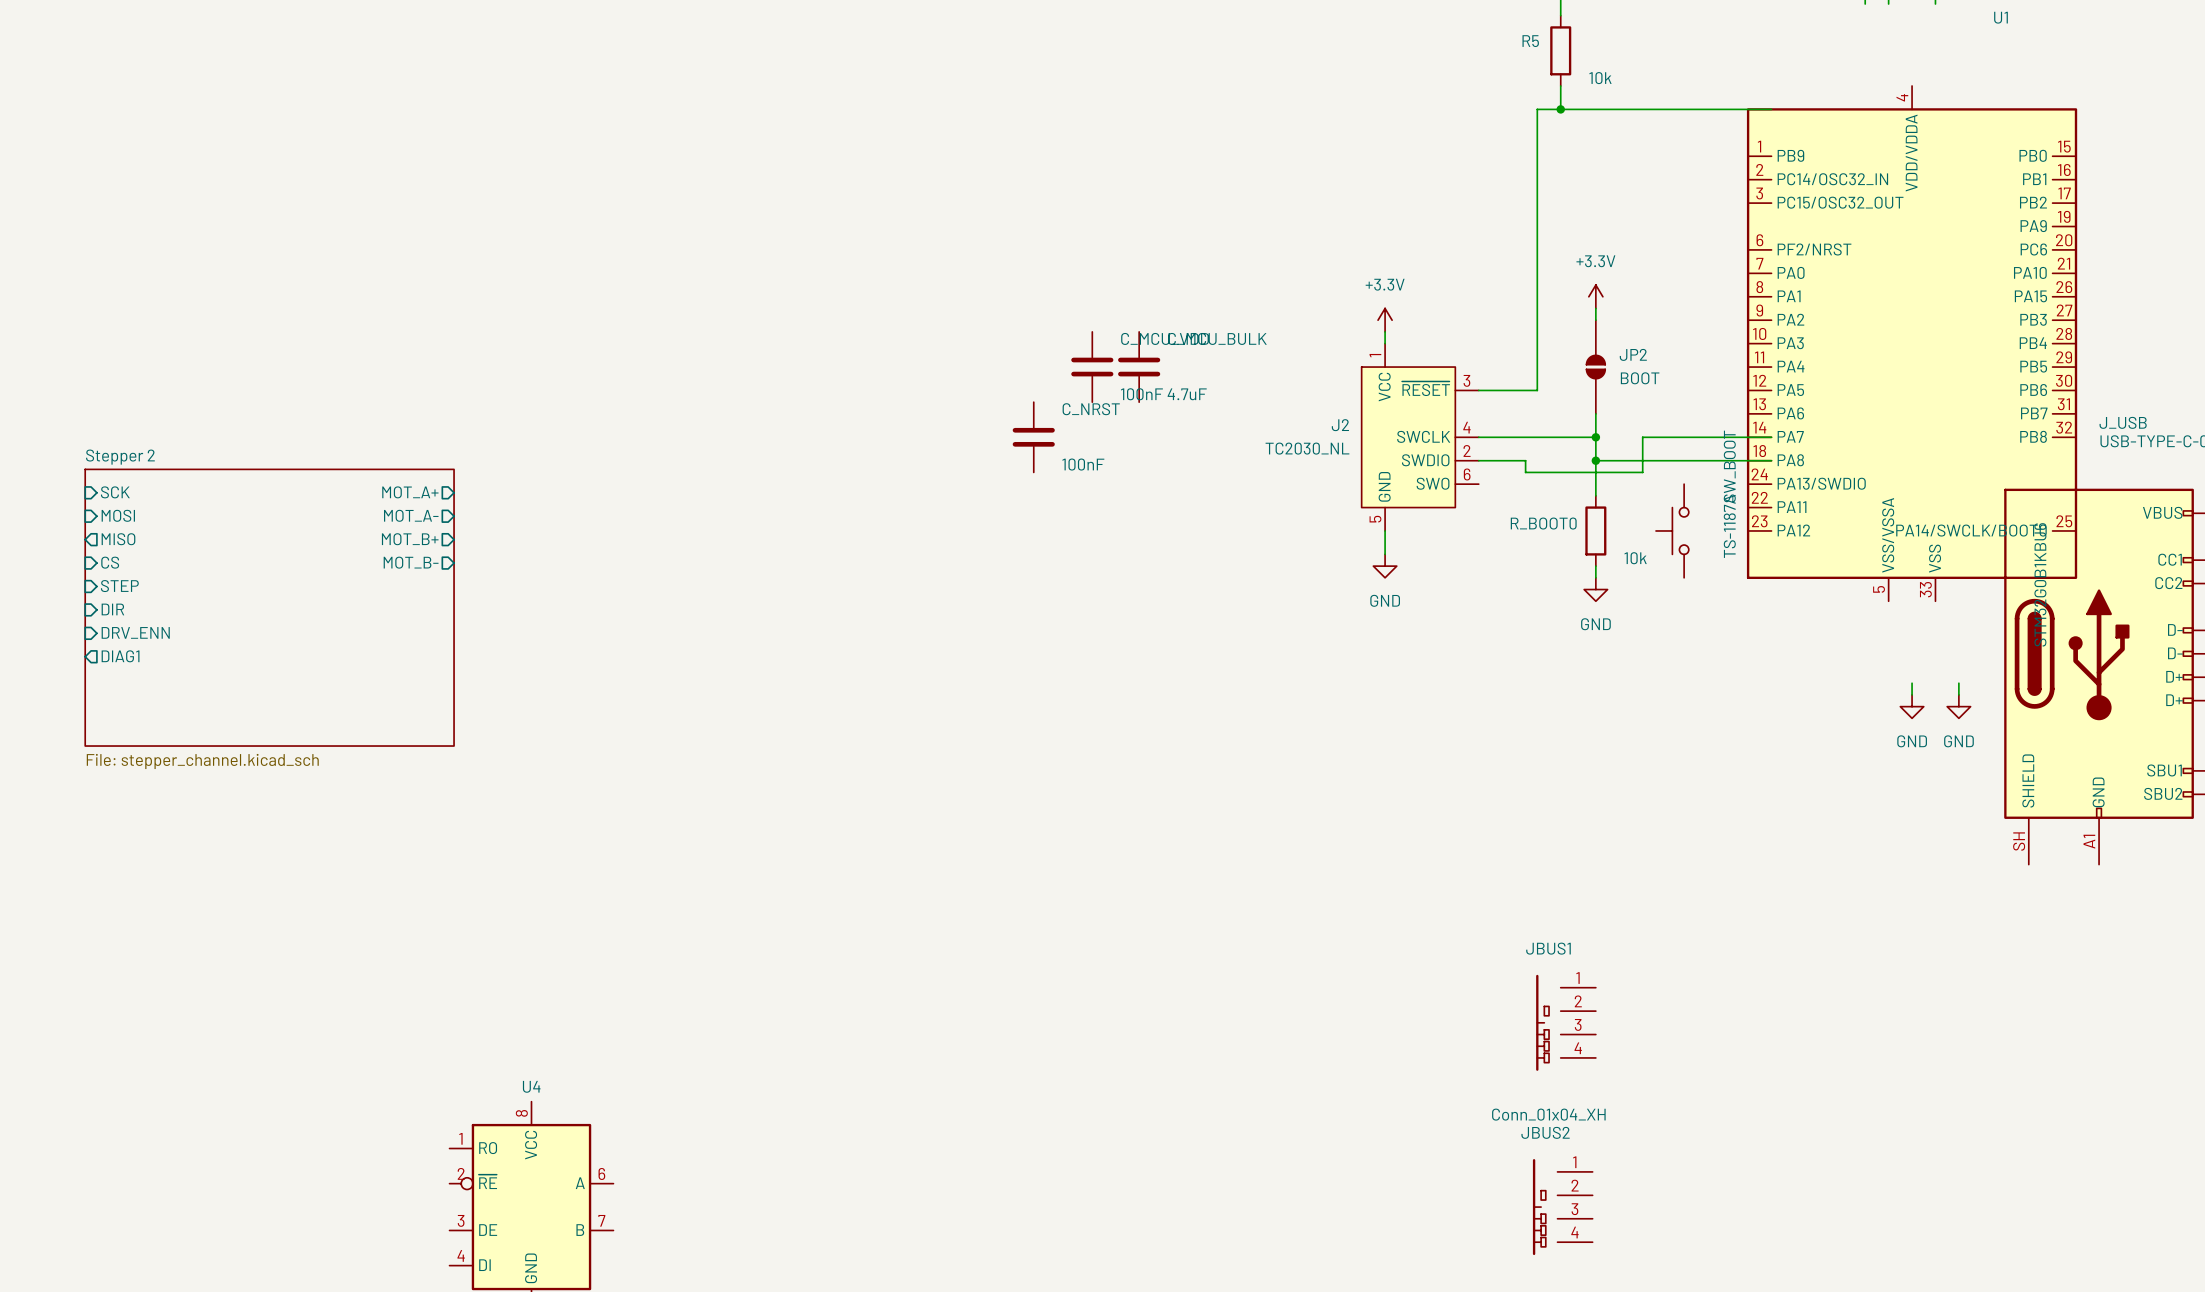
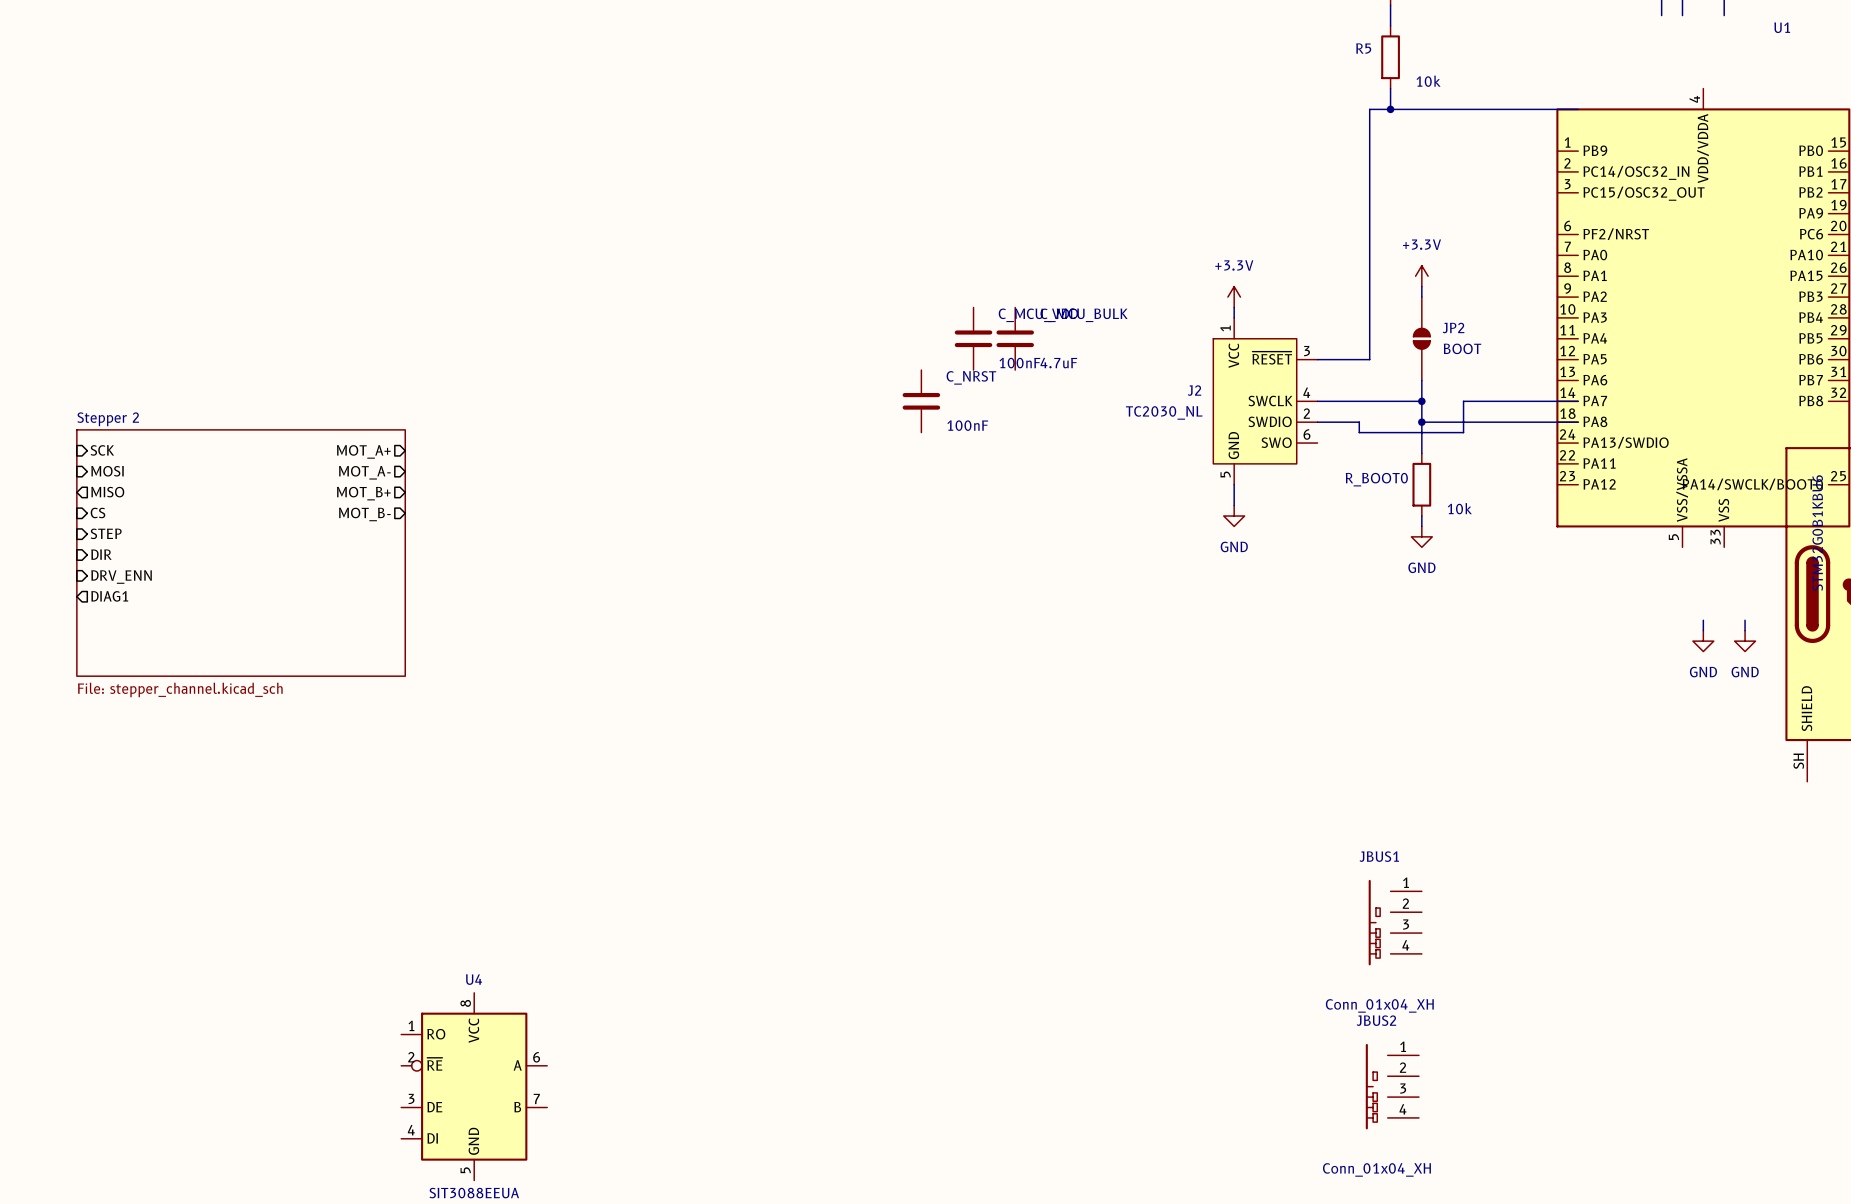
SW_BOOT: TS-1187A (1672, 530) -> none

